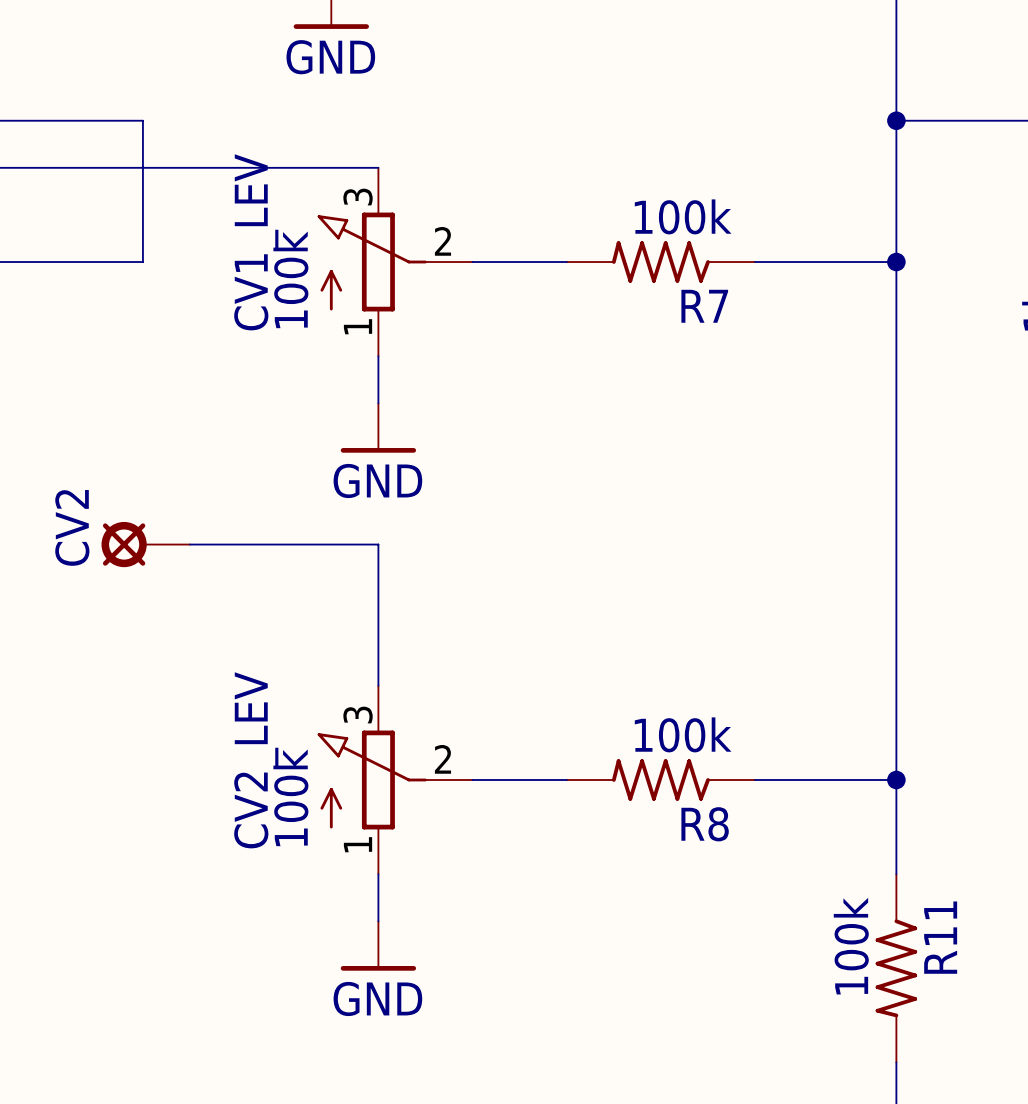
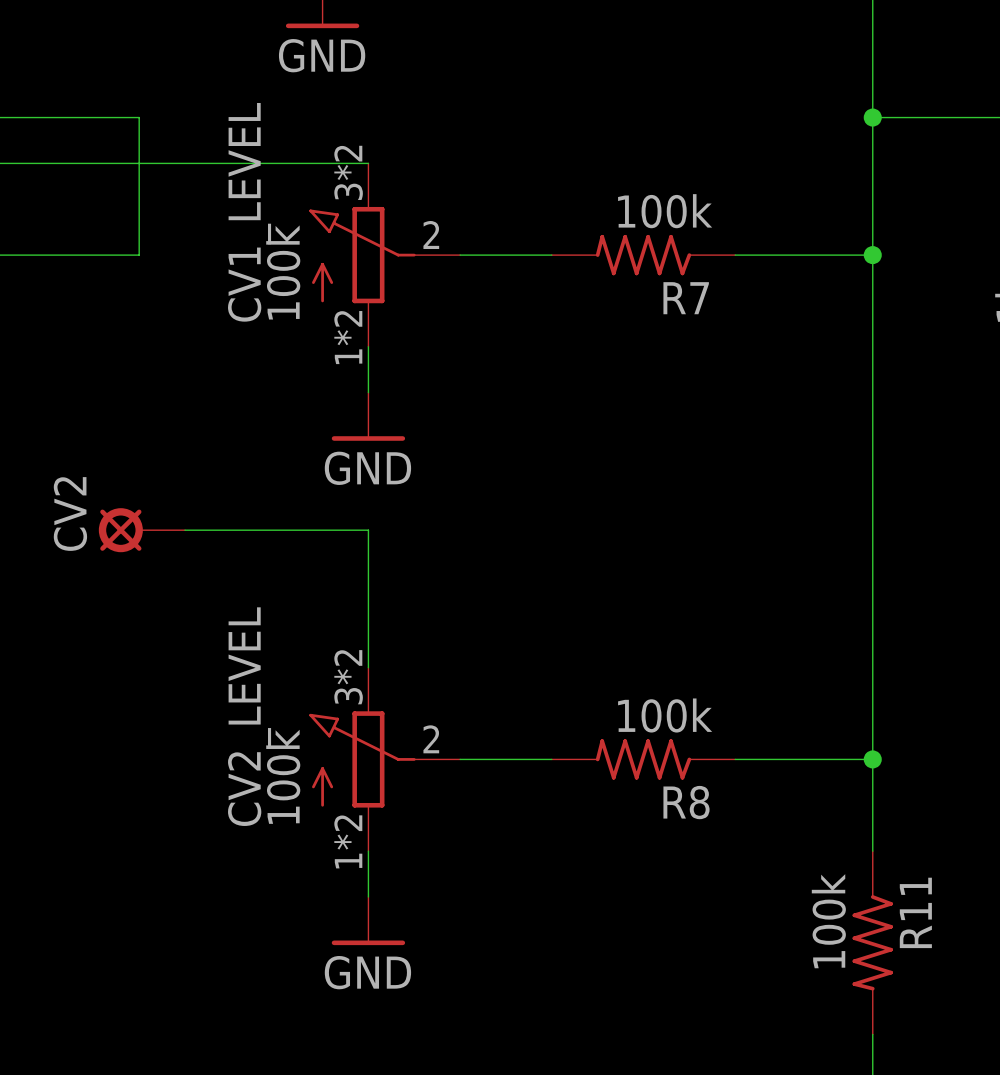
CV1_LEV pin number: 3 (358, 197) -> 3*2 (348, 172)
CV1_LEV name: CV1_LEV (256, 242) -> CV1_LEVEL (249, 212)
CV1_LEV pin number: 1 (358, 326) -> 1*2 (348, 337)
CV2_LEV pin number: 3 (358, 715) -> 3*2 (348, 677)
CV2_LEV name: CV2_LEV (256, 760) -> CV2_LEVEL (249, 716)
CV2_LEV pin number: 1 (358, 844) -> 1*2 (348, 841)

